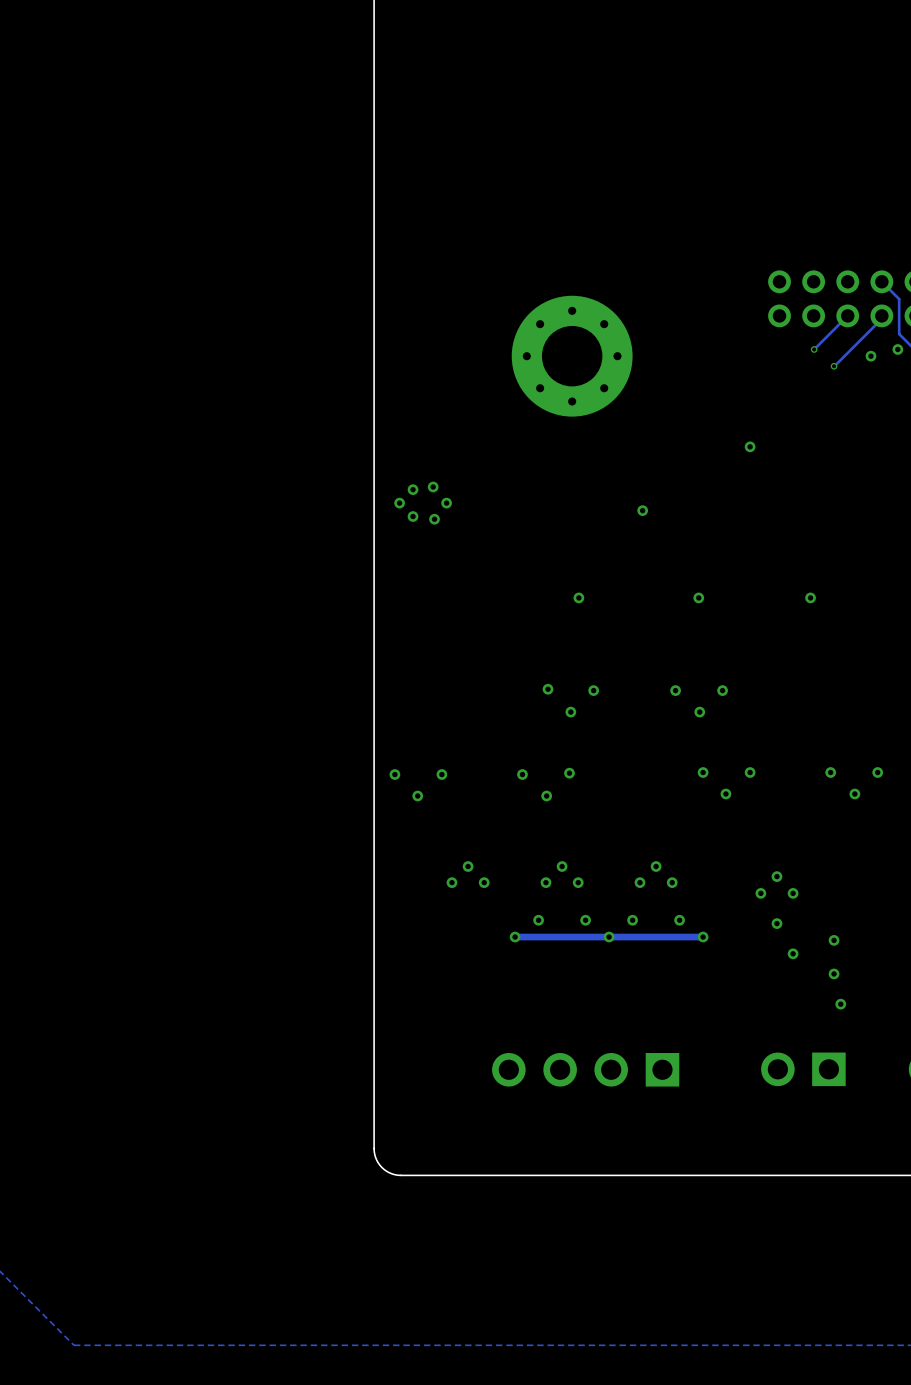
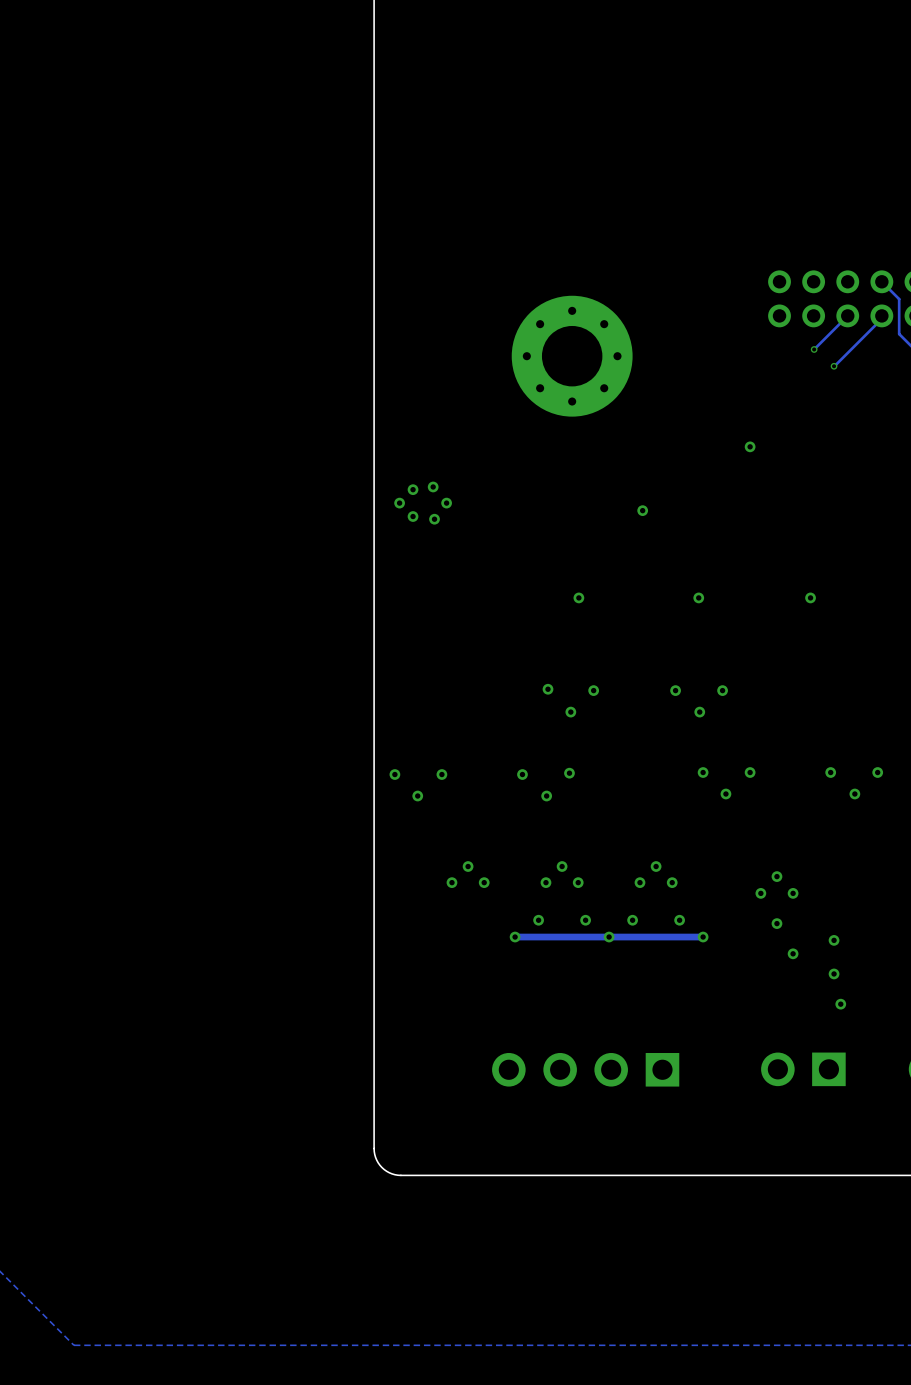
via: (897, 349) -> none
via: (870, 356) -> none

